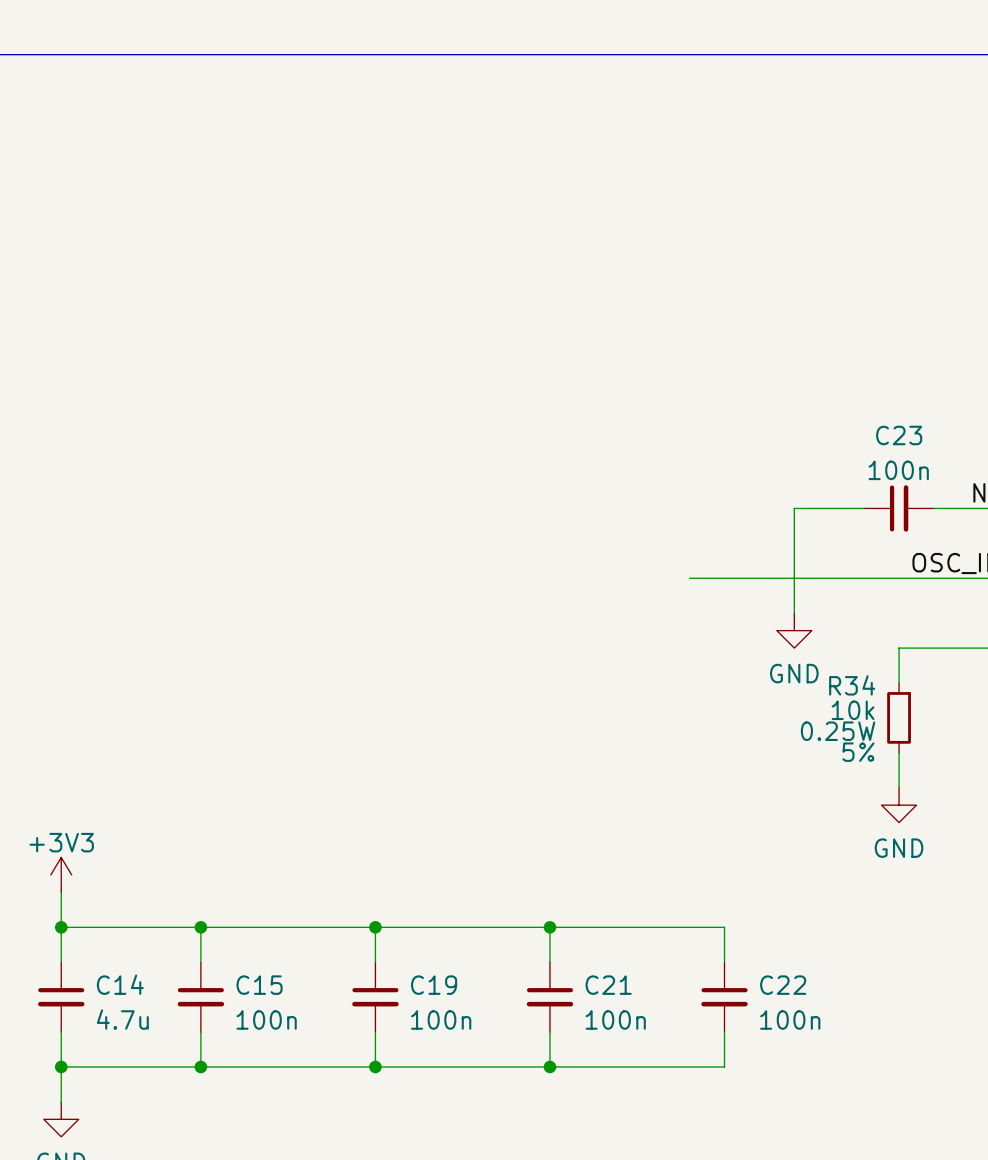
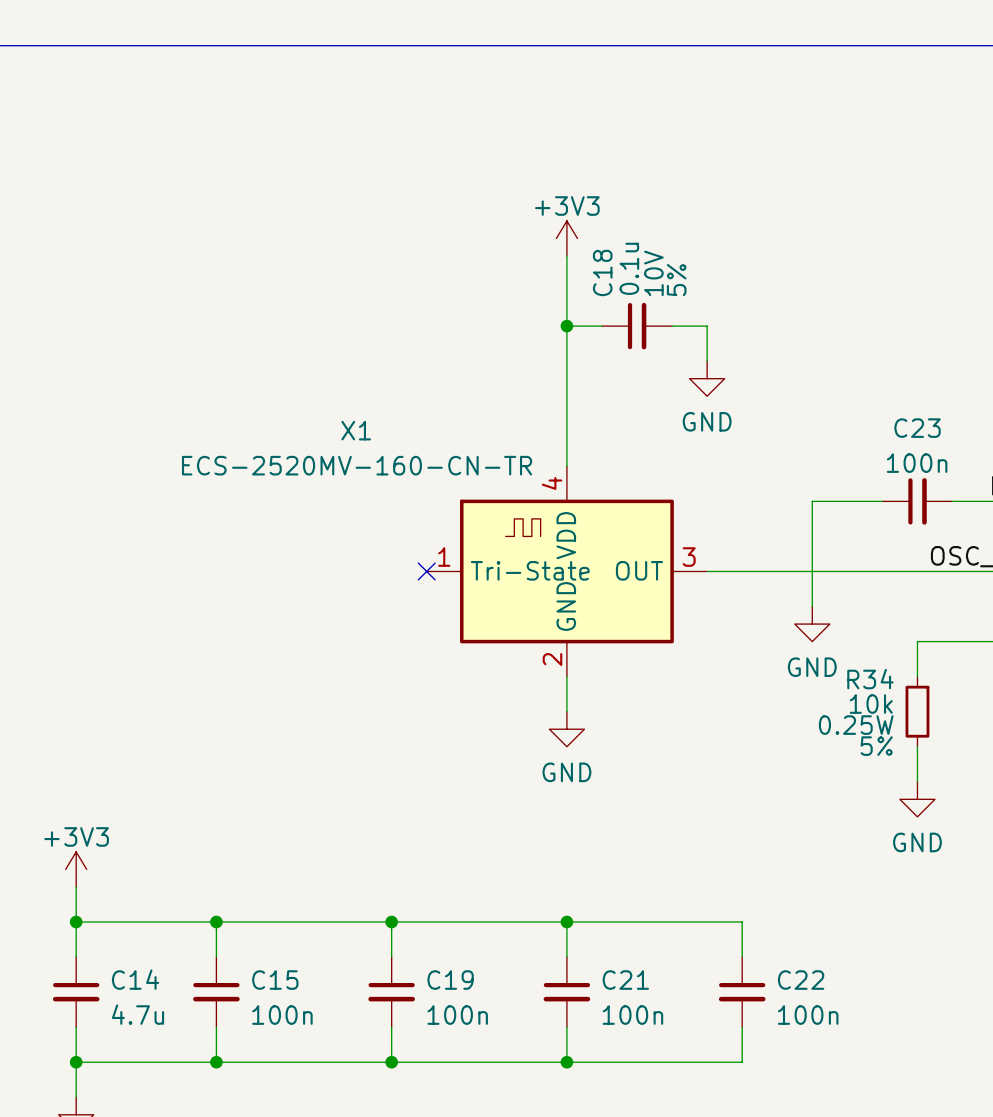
power symbol: none -> +3V3 (566, 238)
wire: none -> (566, 256) (566, 466)
wire: none -> (566, 326) (601, 326)
junction: none -> (566, 326)
C18: none -> 0.1u (637, 326)
wire: none -> (672, 326) (707, 326) (707, 361)
power symbol: none -> GND (707, 378)
no-connect mark: none -> (426, 571)
X1: none -> ECS-2520MV-160-CN-TR (566, 571)
wire: none -> (566, 676) (566, 711)
power symbol: none -> GND (566, 729)

